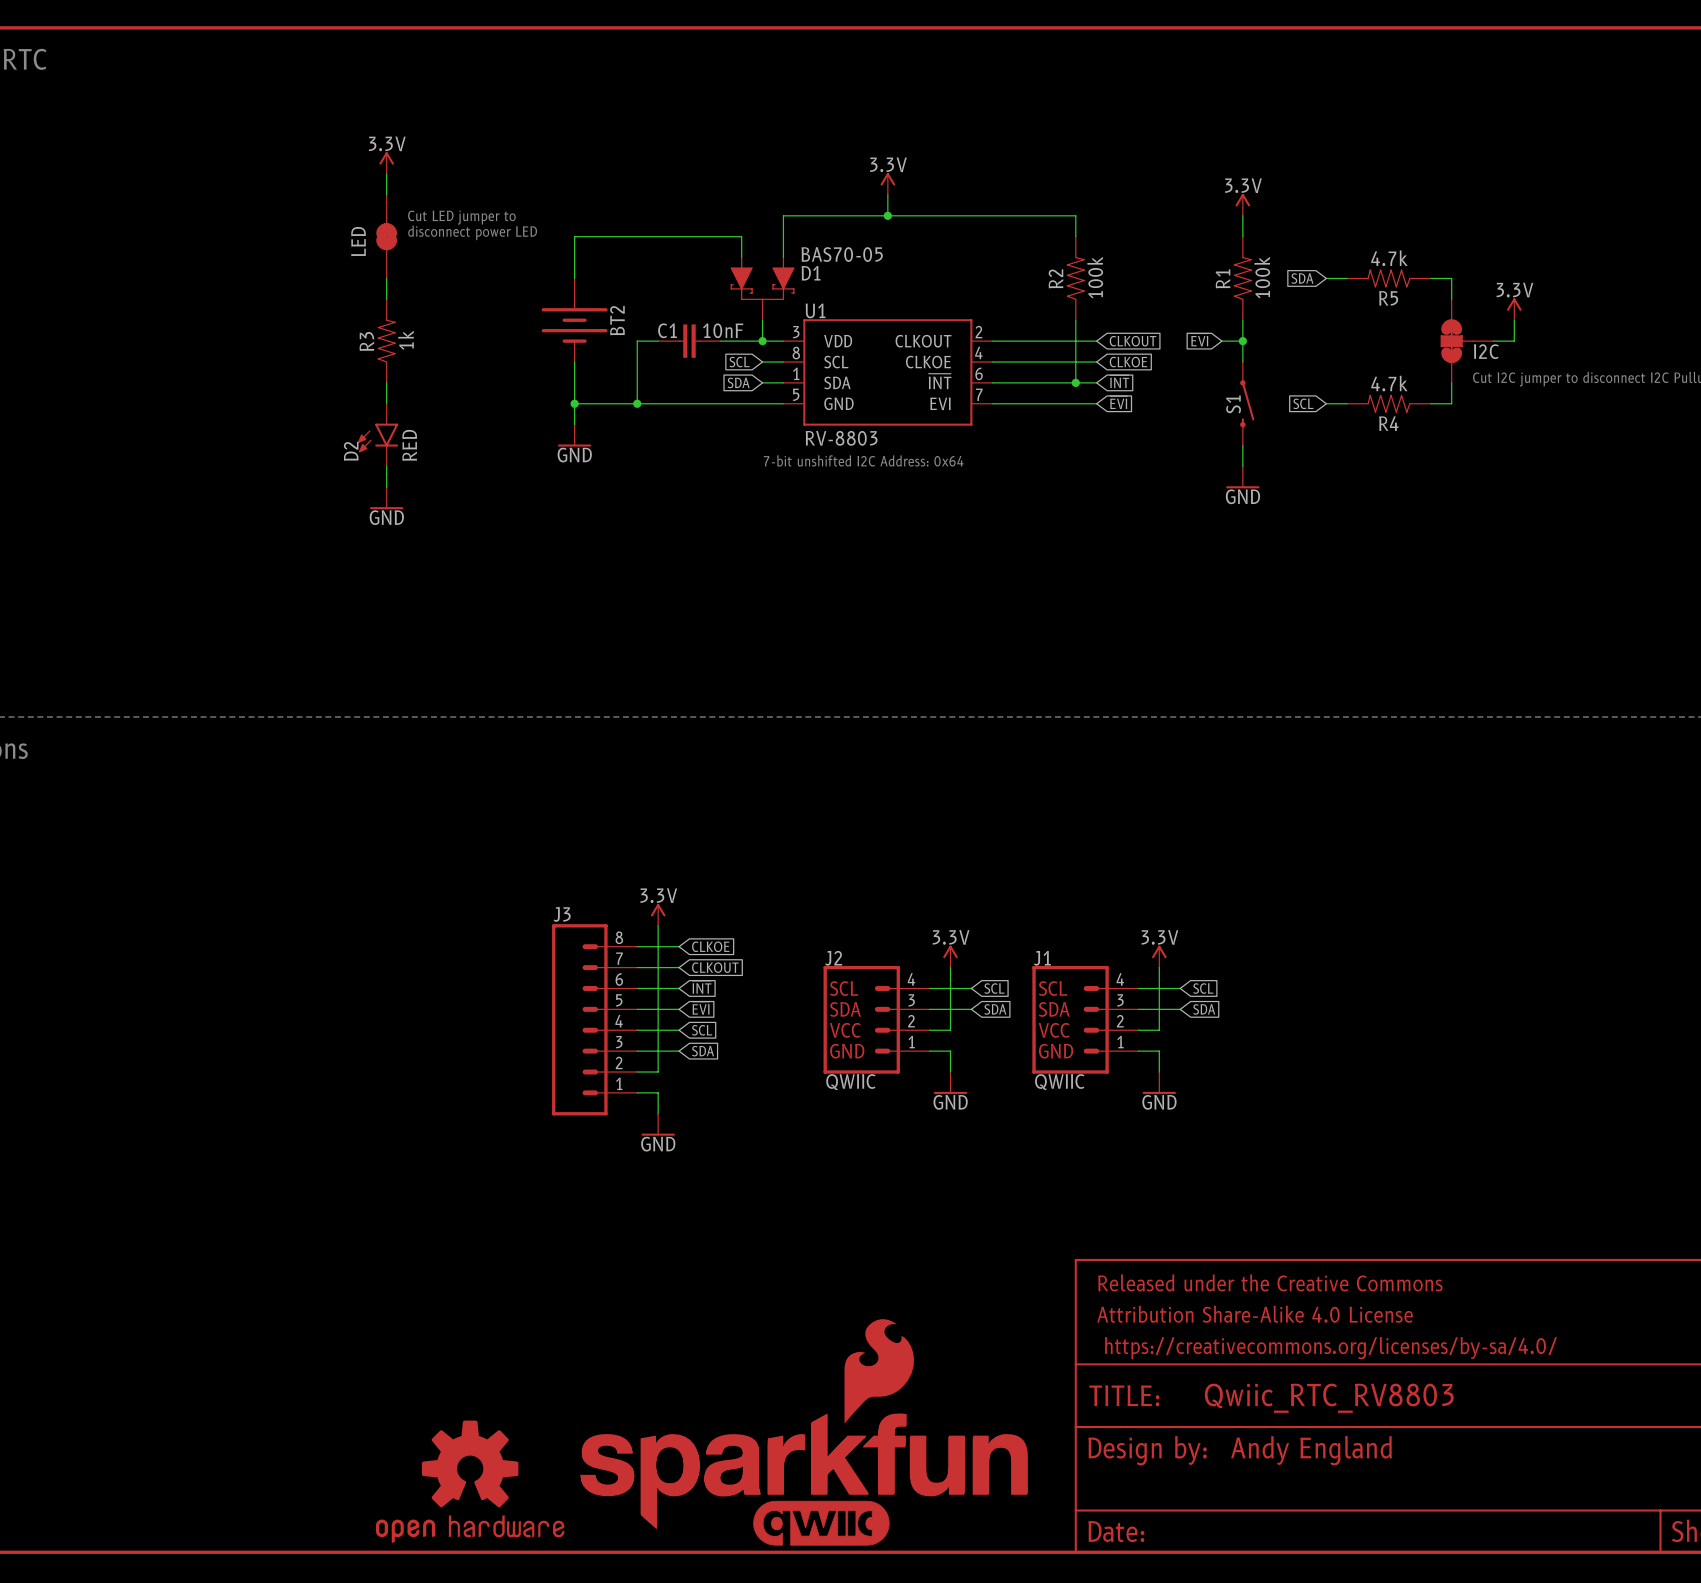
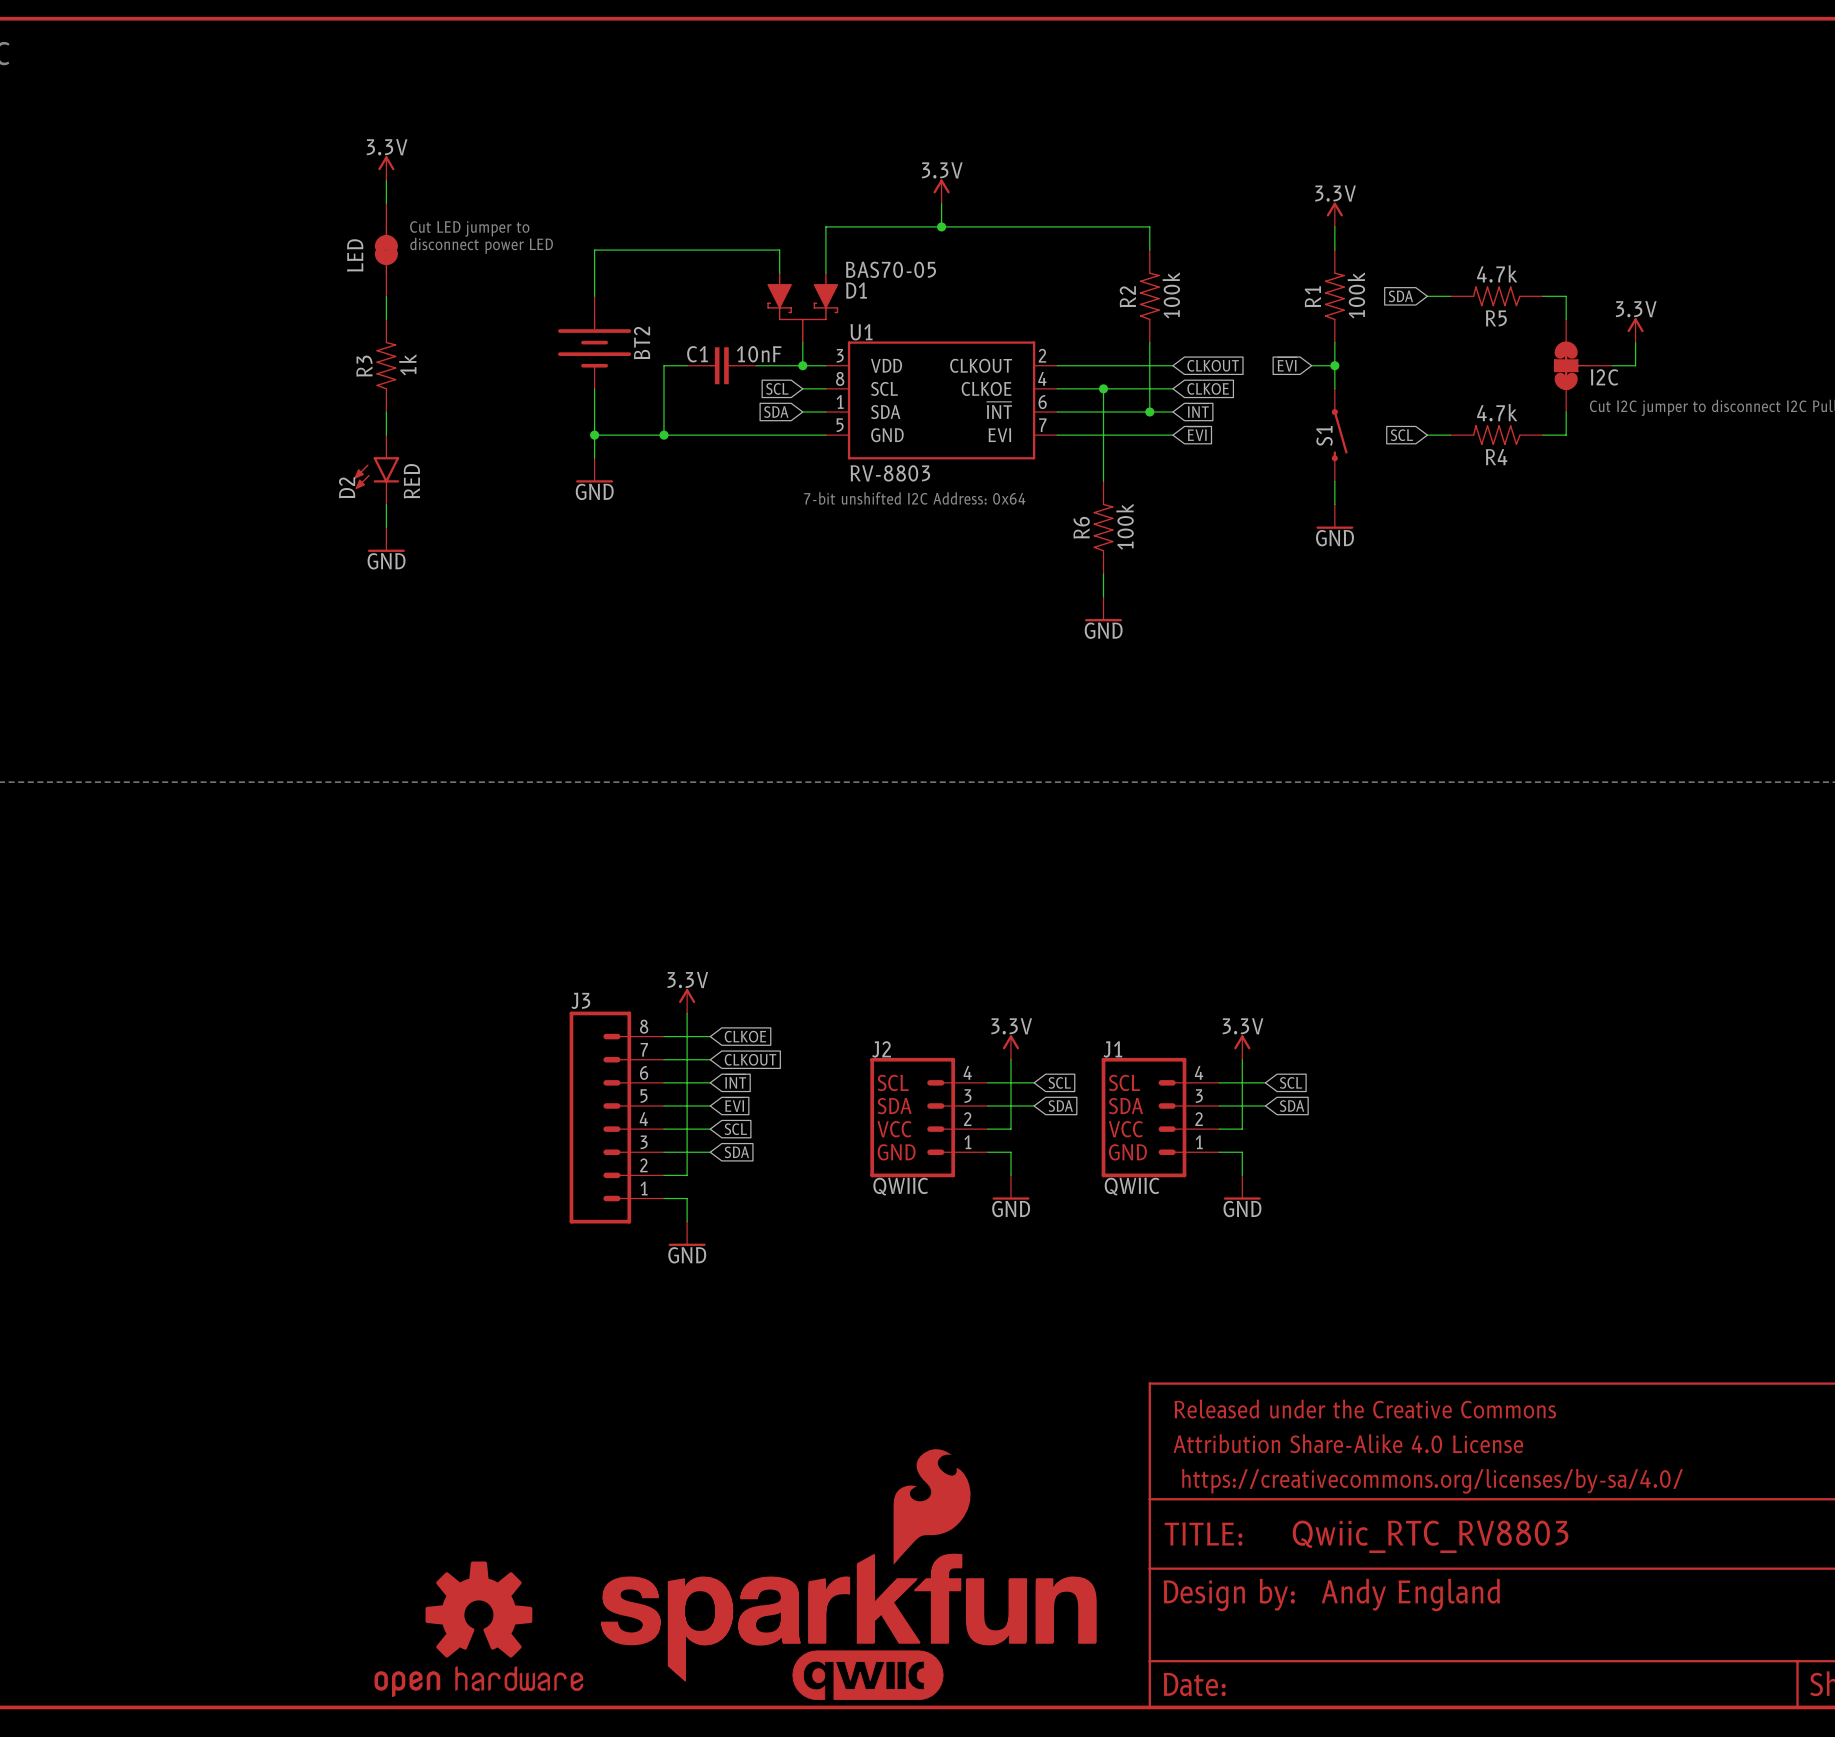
wire: none -> (1103, 388) (1103, 481)
junction: none -> (1103, 388)
R6: none -> 100k (1103, 527)
wire: none -> (1103, 573) (1103, 597)
power symbol: none -> GND (1103, 609)

